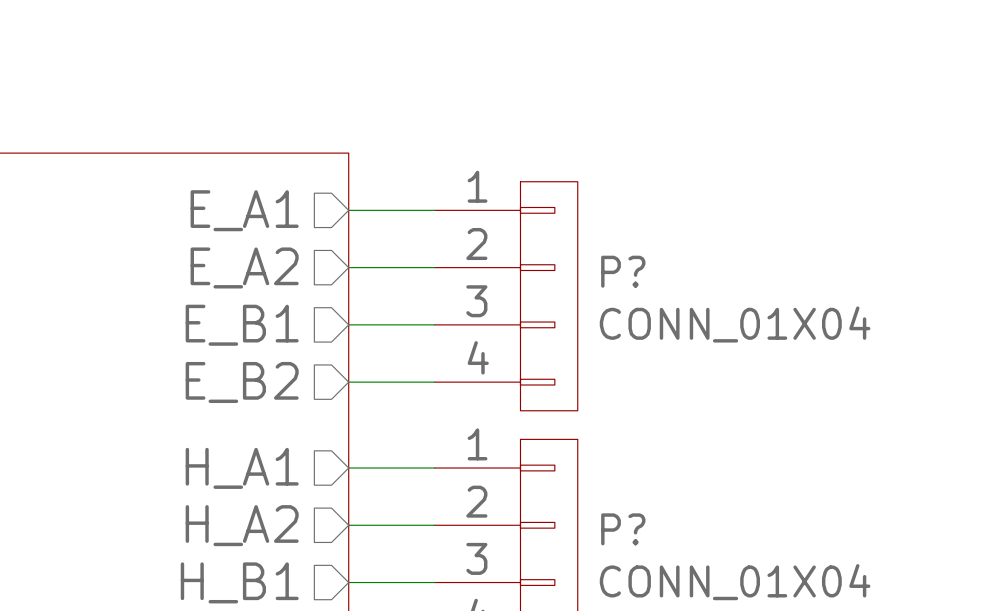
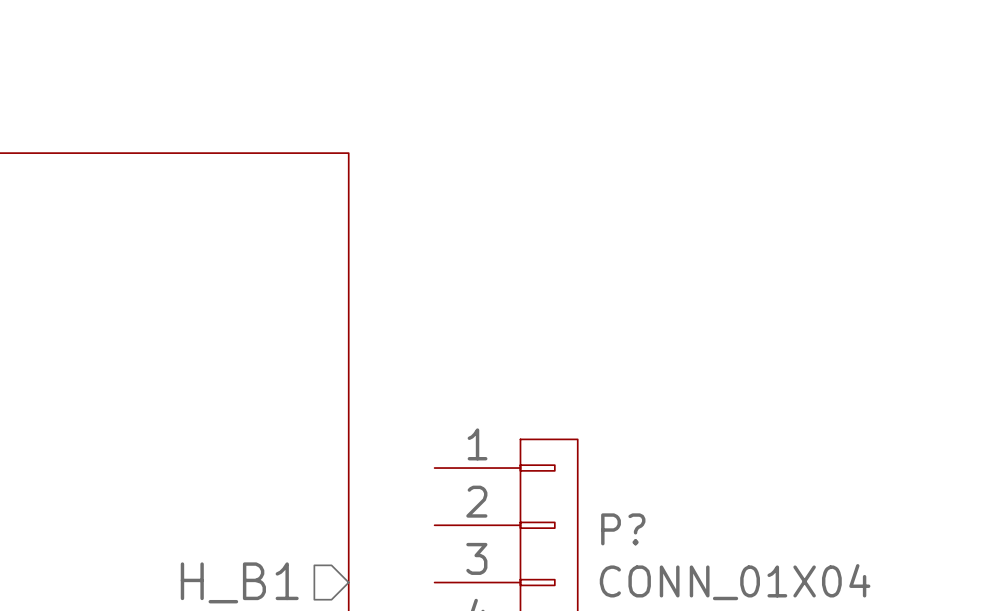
sheet pin: E_A1 (244, 210) -> none
wire: (348, 210) (434, 210) -> none
sheet pin: E_A2 (244, 267) -> none
wire: (348, 267) (434, 267) -> none
P?: CONN_01X04 (506, 296) -> none
wire: (348, 324) (434, 324) -> none
sheet pin: E_B1 (242, 325) -> none
sheet pin: E_B2 (242, 382) -> none
wire: (348, 382) (434, 382) -> none
sheet pin: H_A1 (242, 468) -> none
wire: (348, 468) (434, 468) -> none
sheet pin: H_A2 (242, 525) -> none
wire: (348, 525) (434, 525) -> none
wire: (348, 582) (434, 582) -> none

